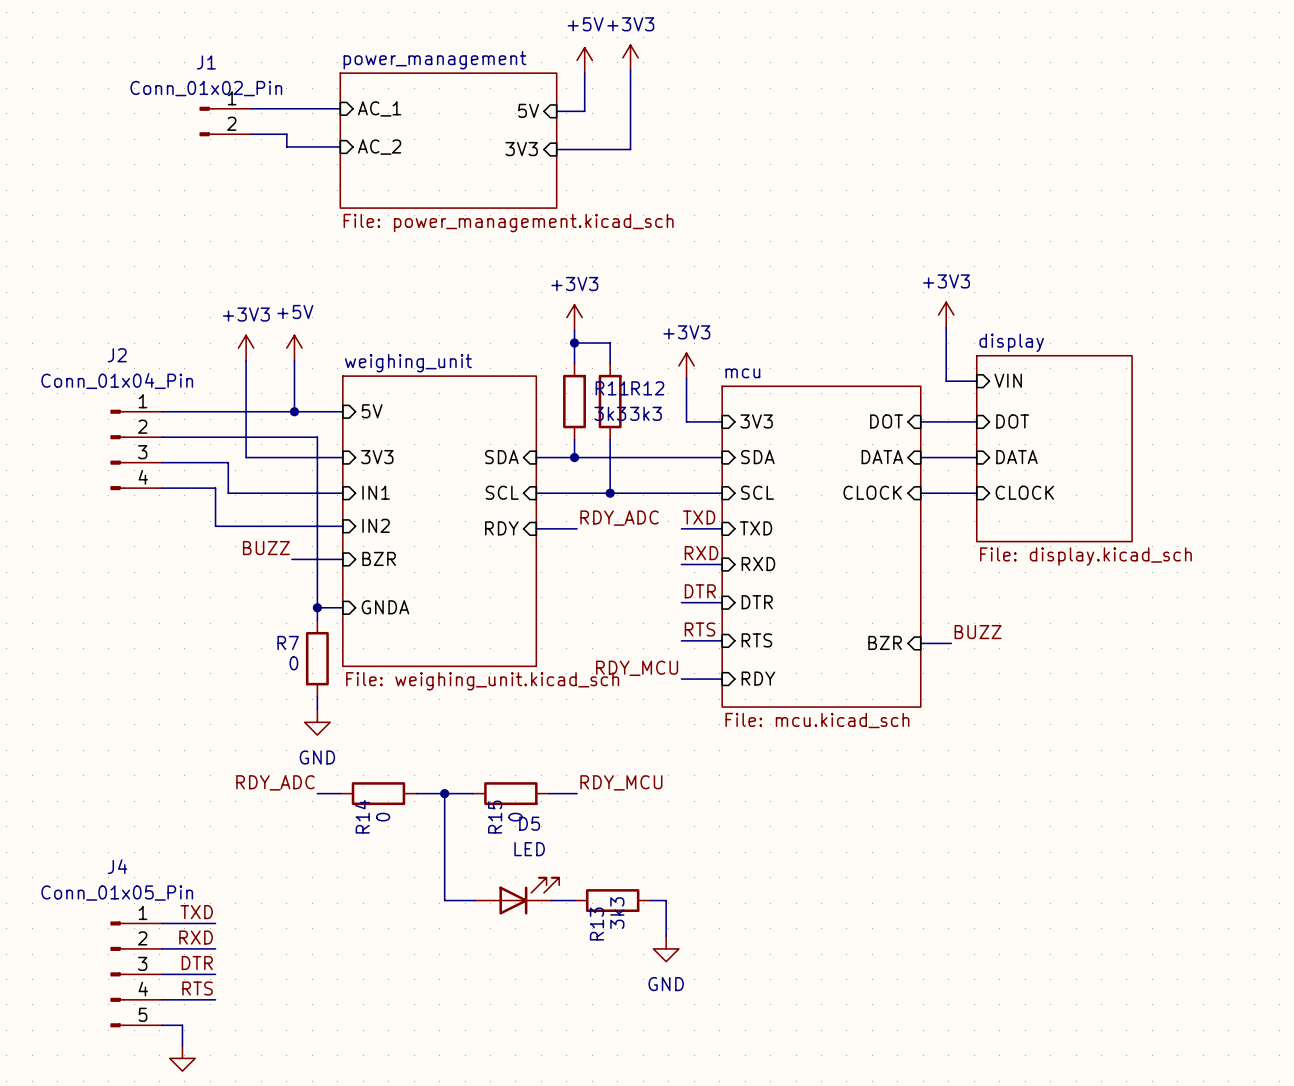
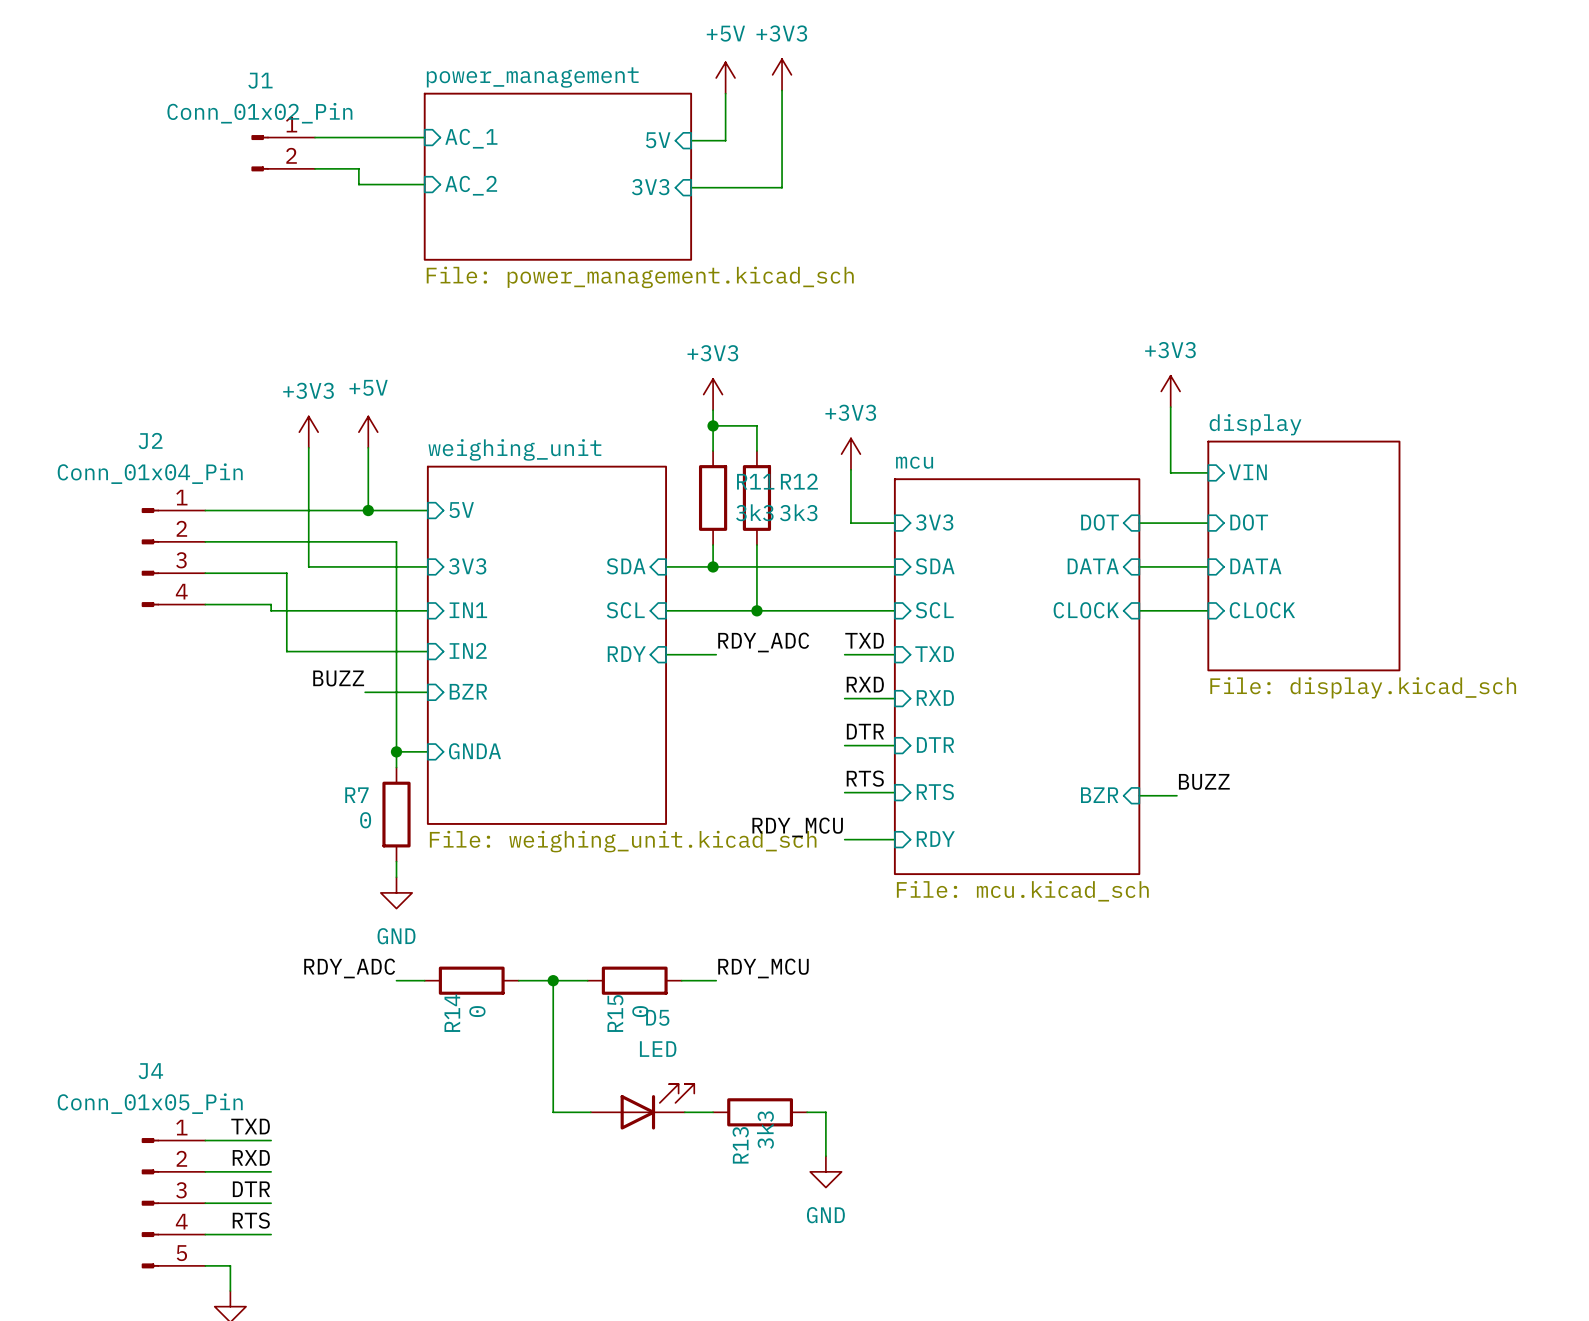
wire: (215, 493) (215, 526) (228, 526) -> (271, 610) (286, 610) (286, 651)

